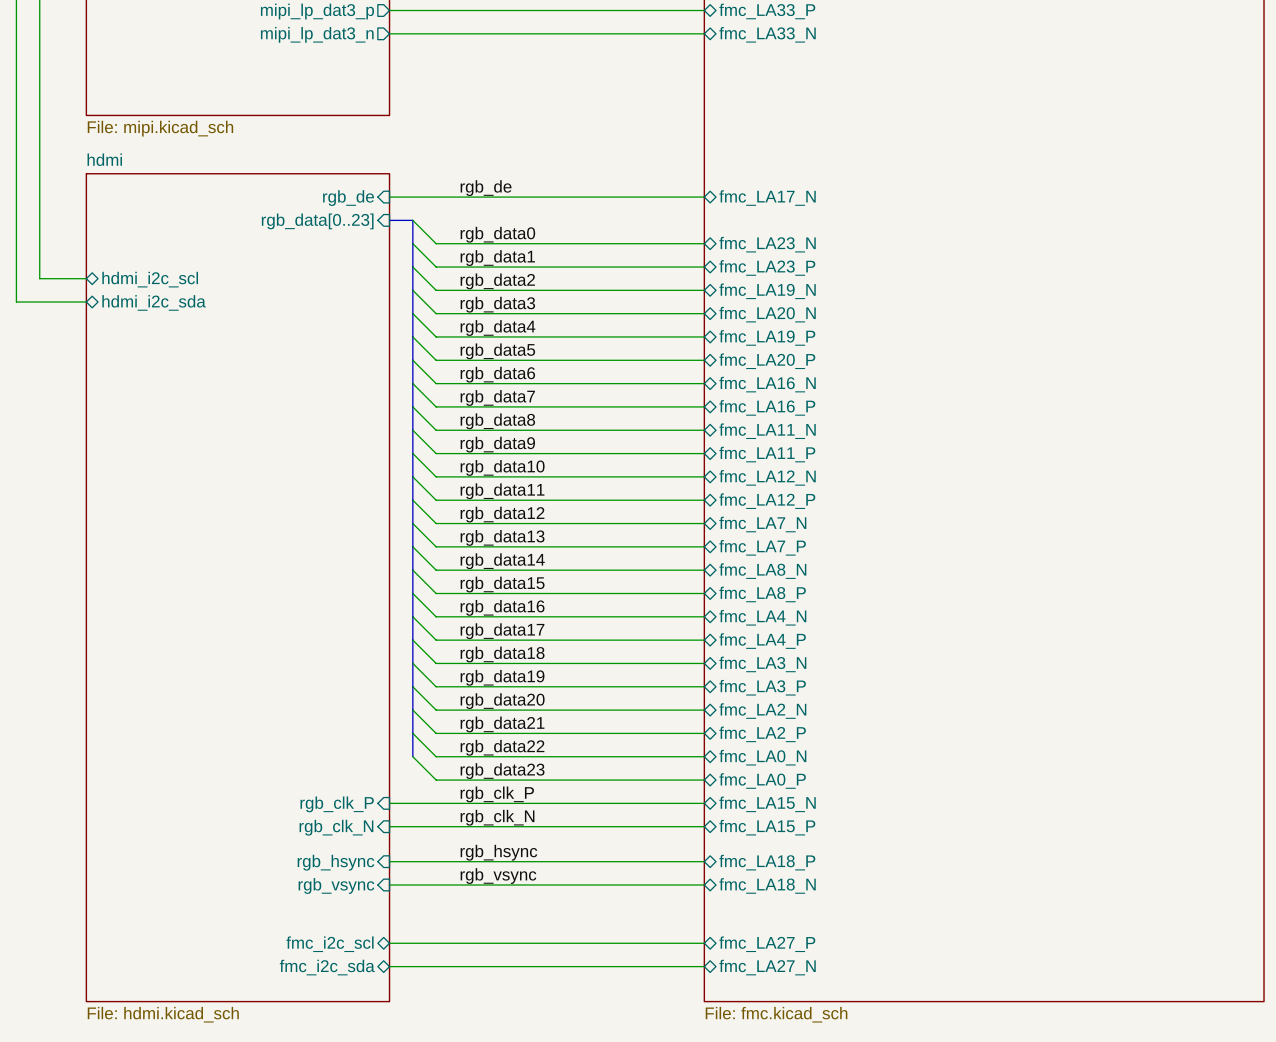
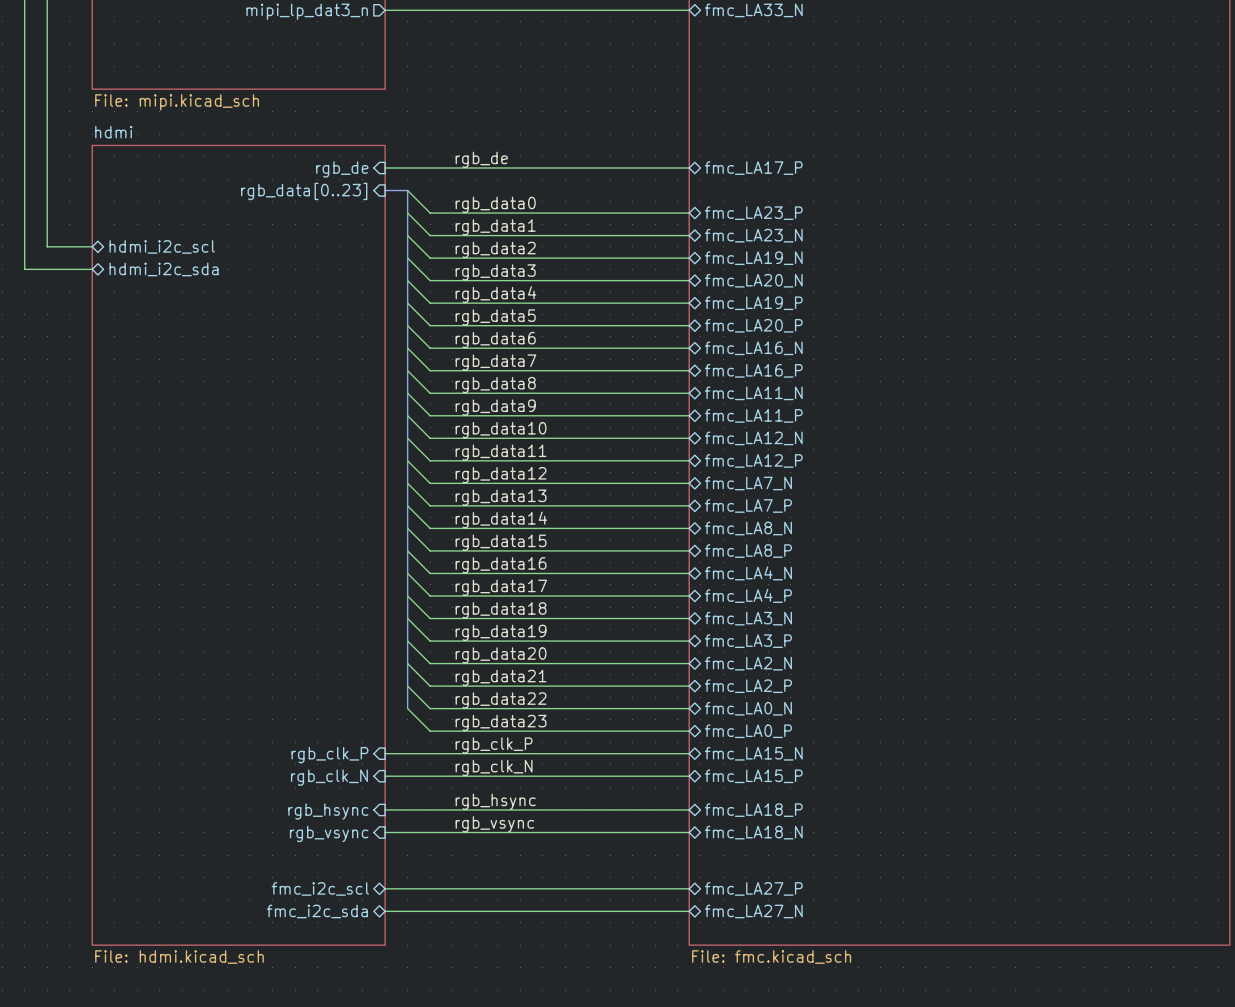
sheet pin: fmc_LA17_N (767, 198) -> fmc_LA17_P (753, 168)
sheet pin: fmc_LA23_N (767, 244) -> fmc_LA23_P (753, 213)
sheet pin: fmc_LA23_P (767, 267) -> fmc_LA23_N (753, 235)

